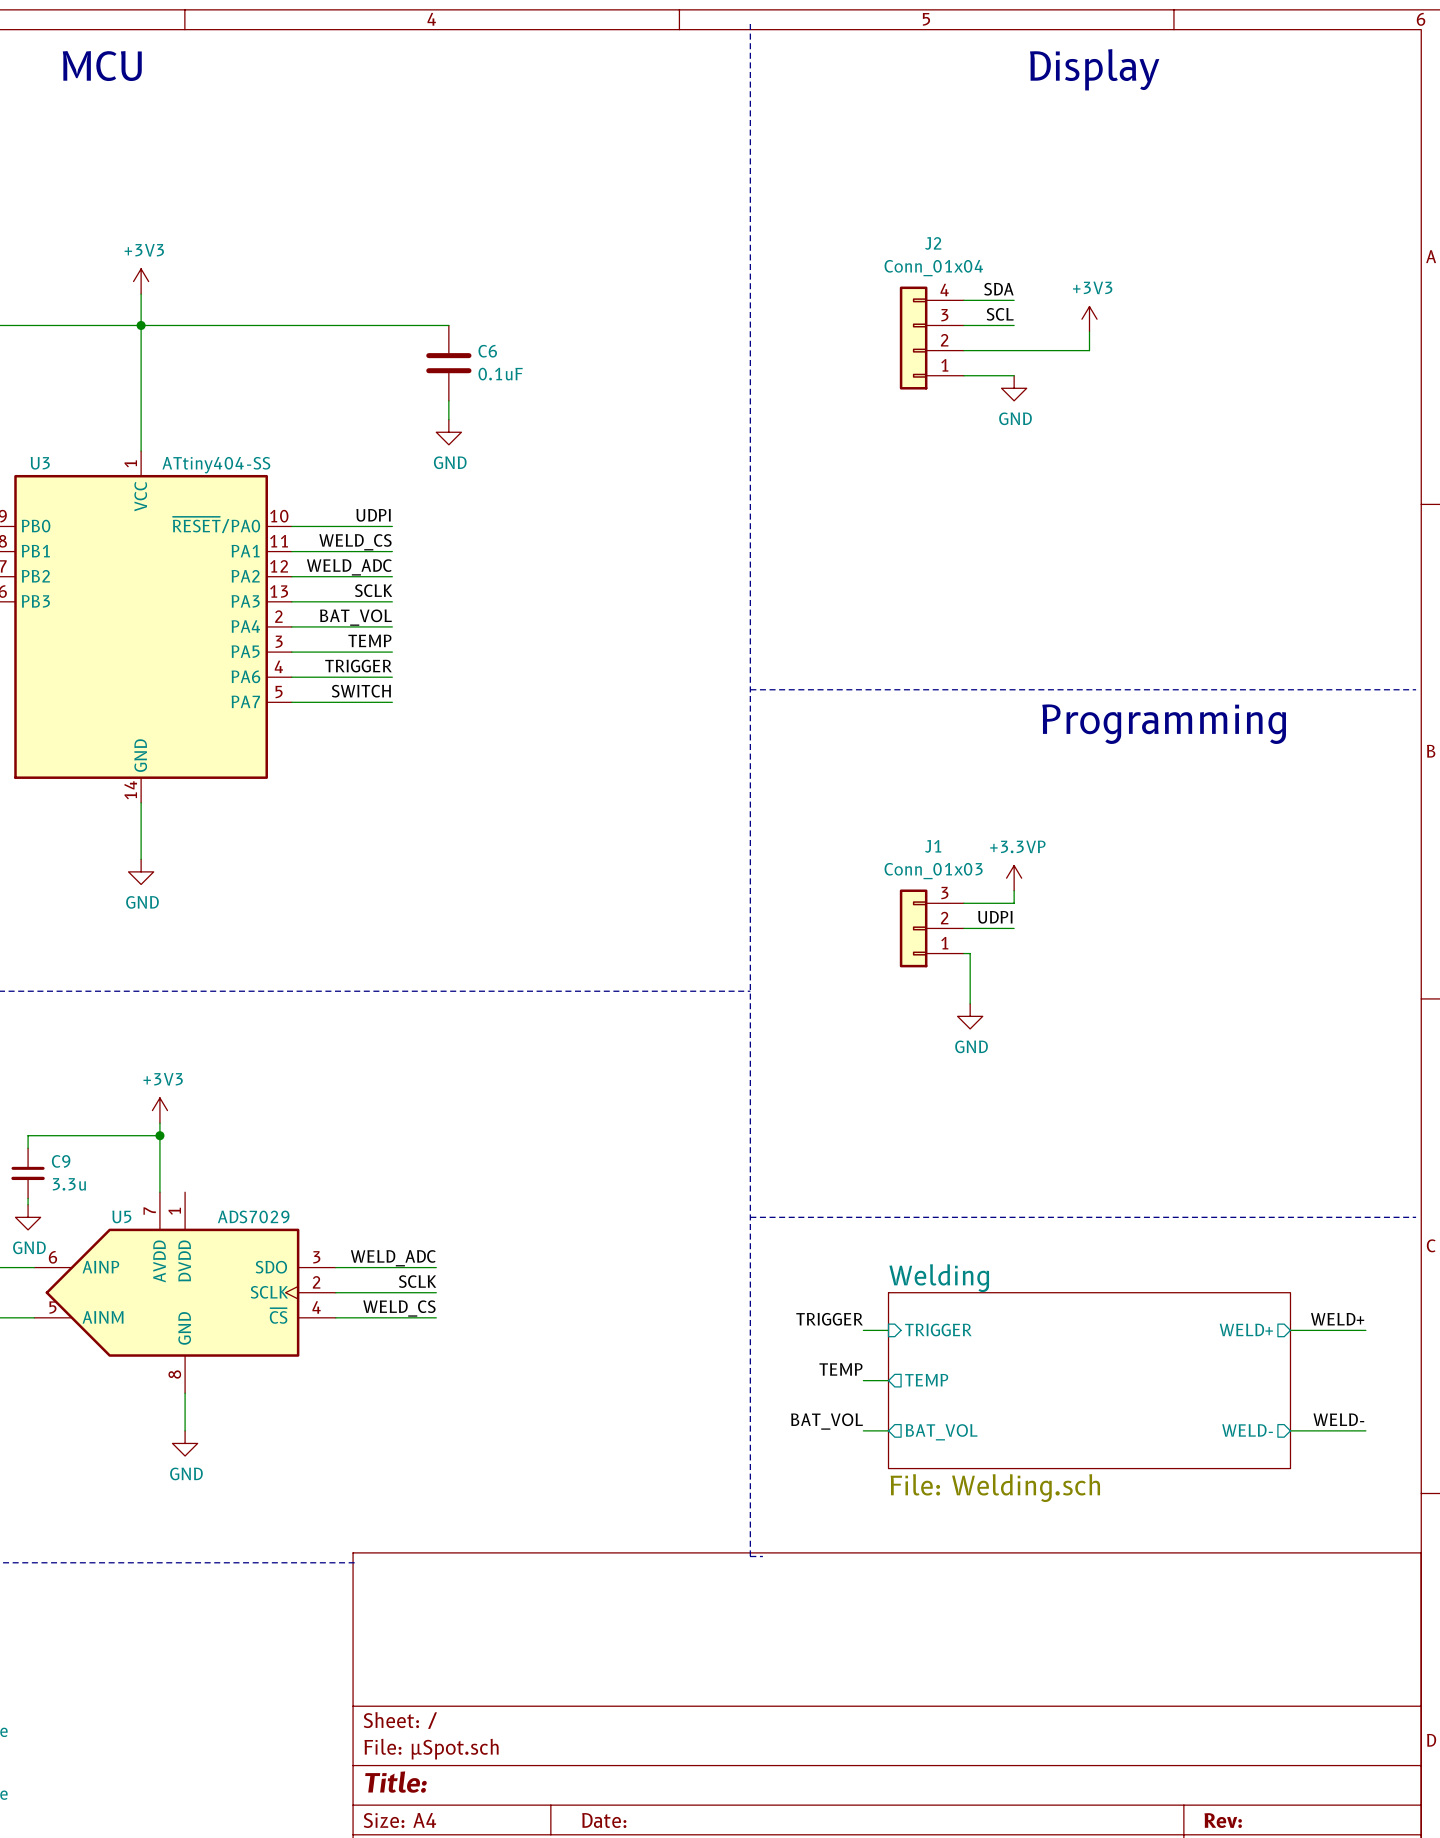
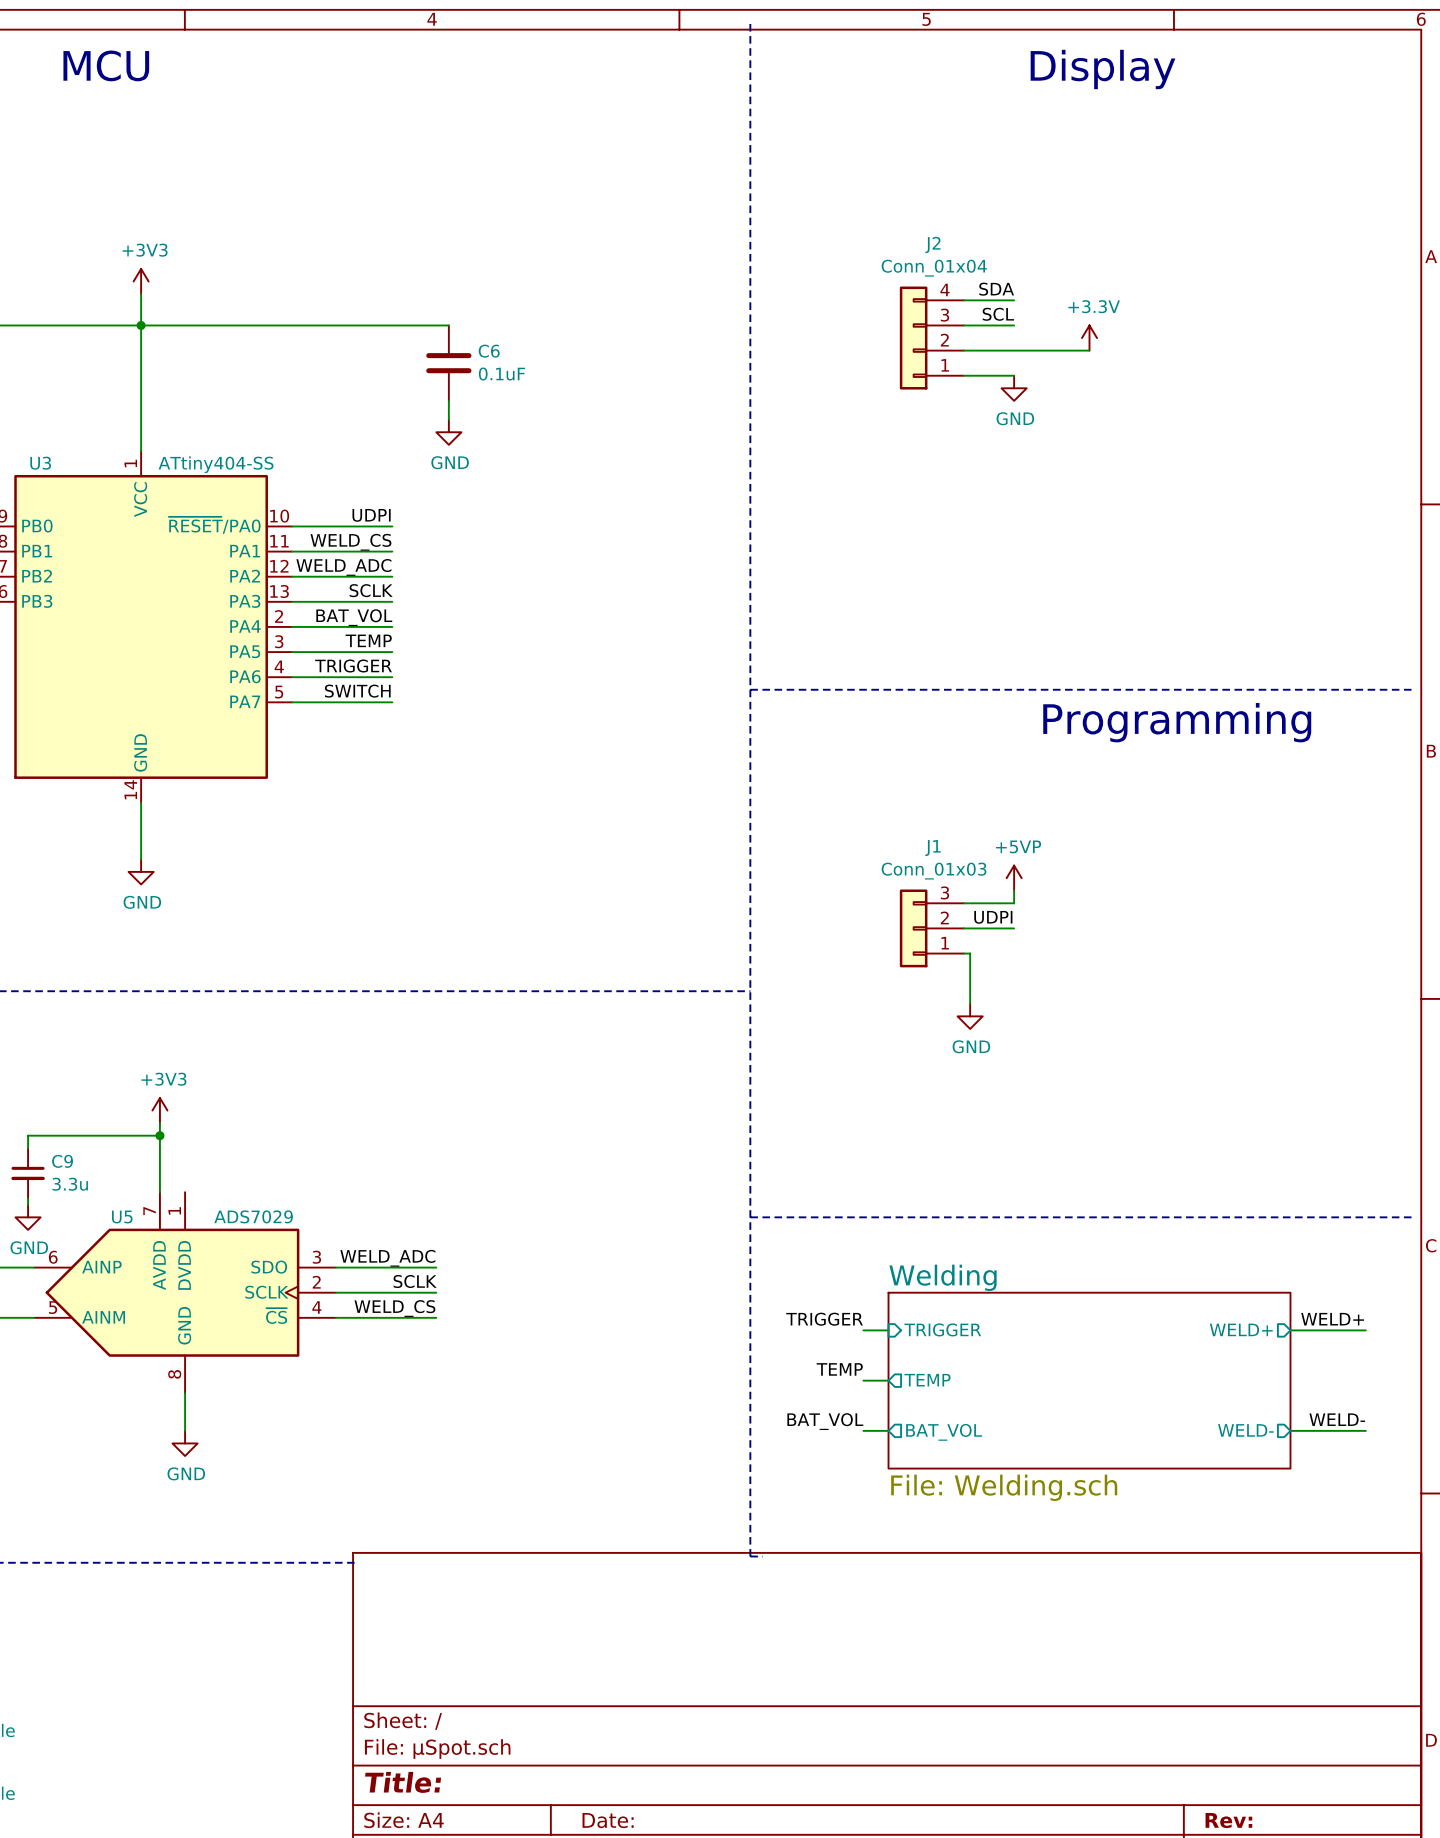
power symbol: +3V3 (1089, 319) -> none
power symbol: none -> +3.3V (1089, 338)
power symbol: +3.3VP (1014, 878) -> +5VP (1014, 878)

